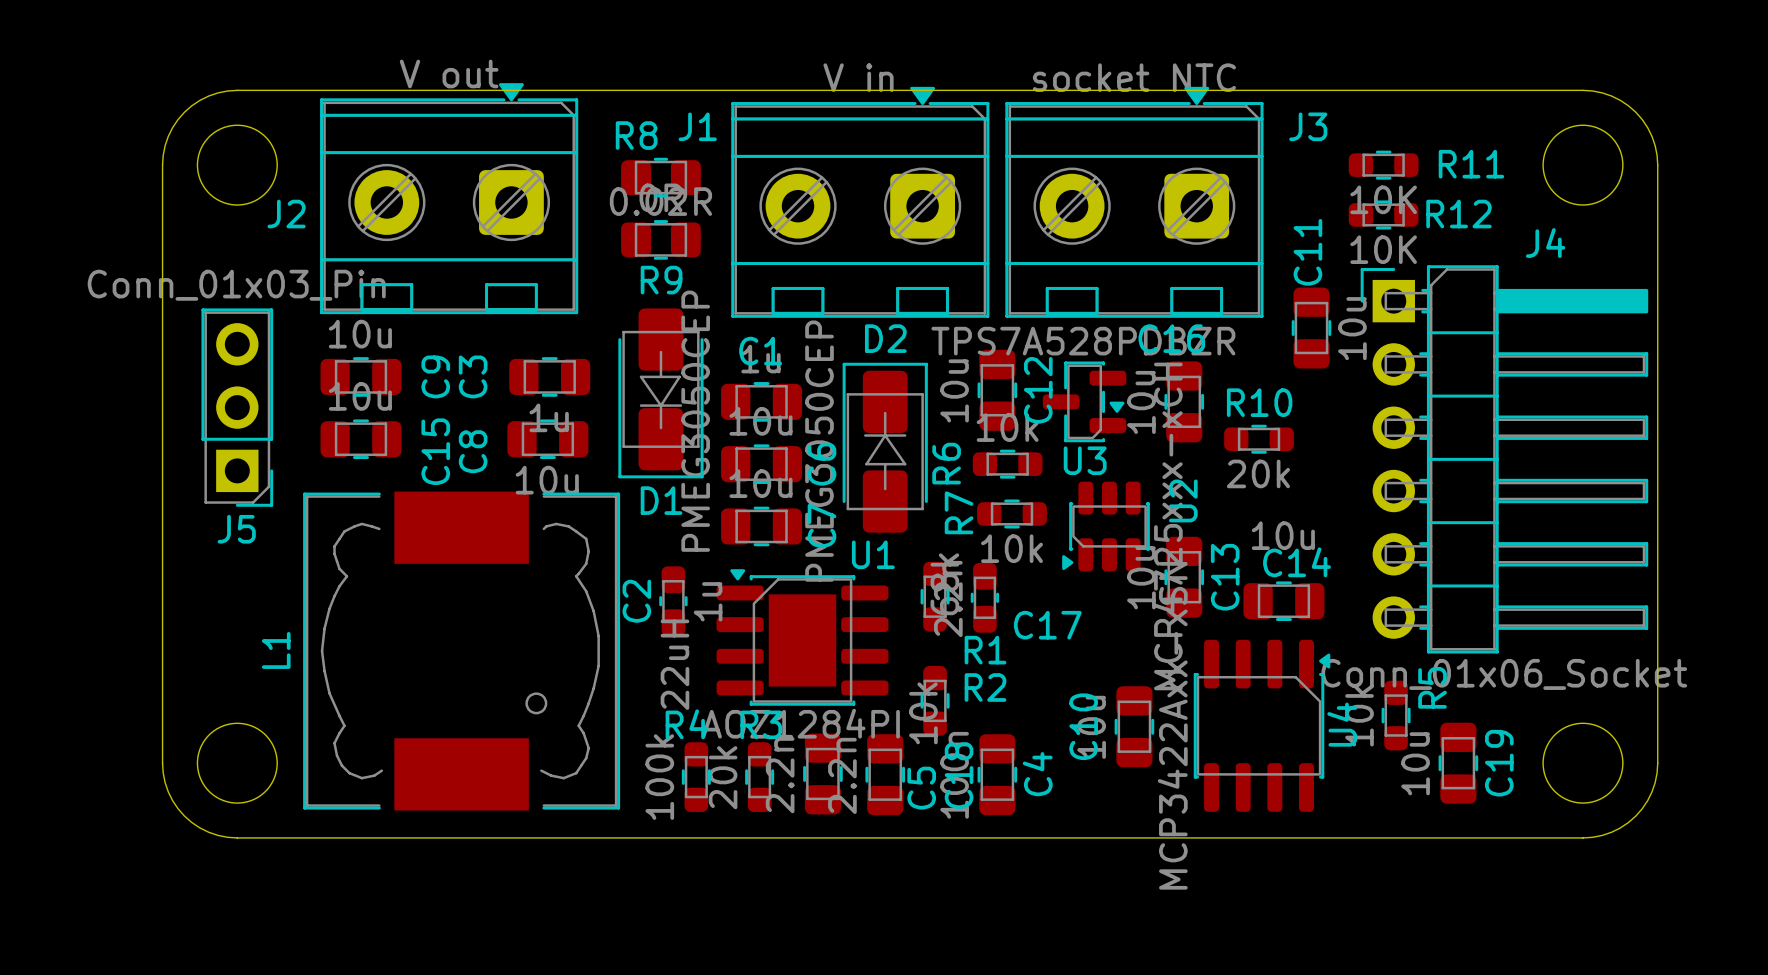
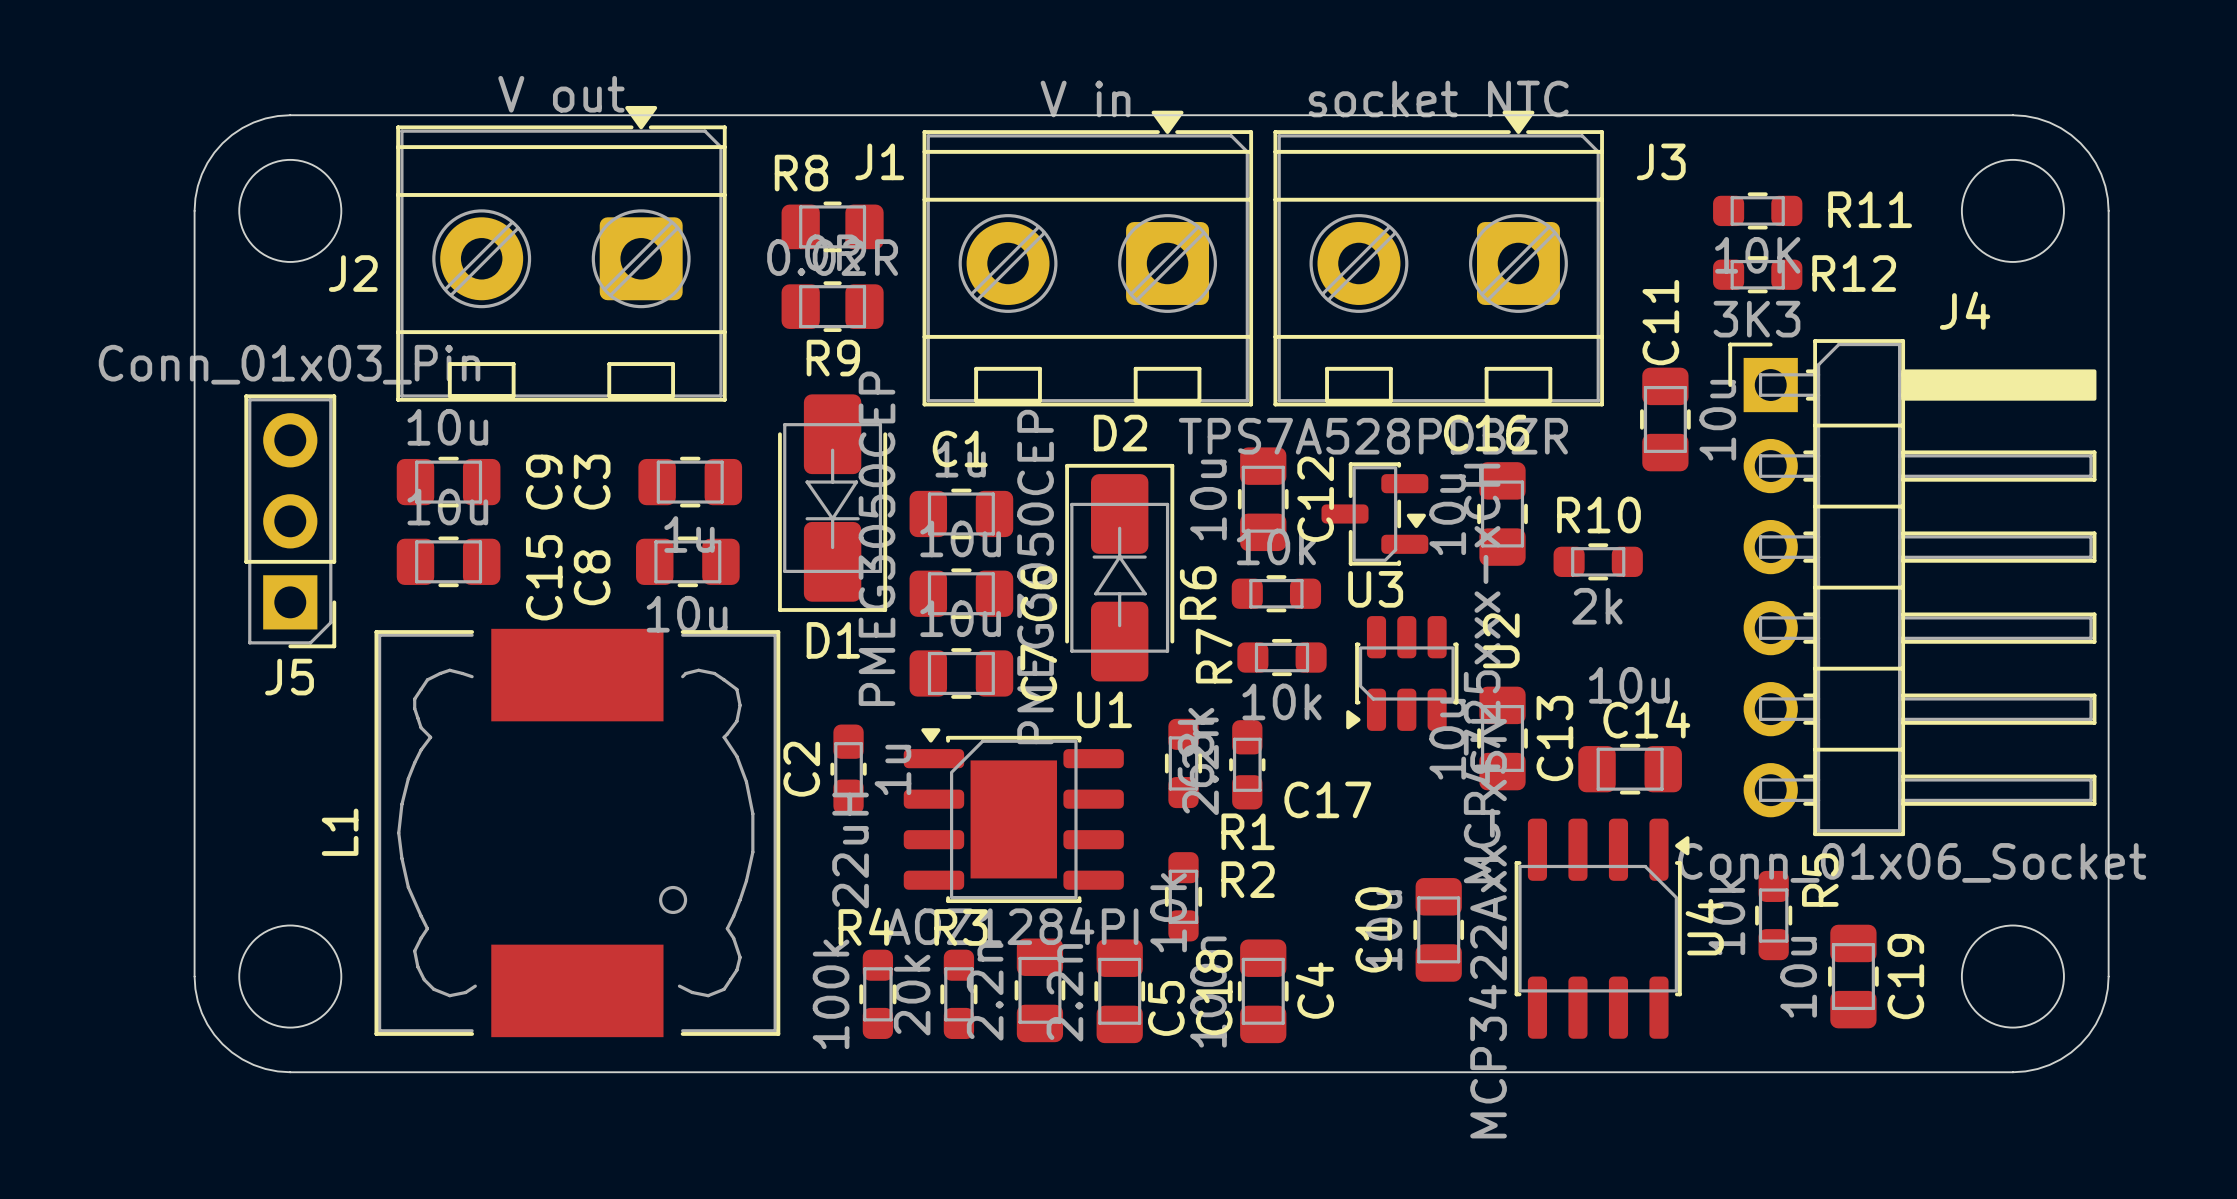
R12 value: 10K (1383, 249) -> 3K3 (1756, 319)
R10 value: 20k (1258, 473) -> 2k (1597, 606)

